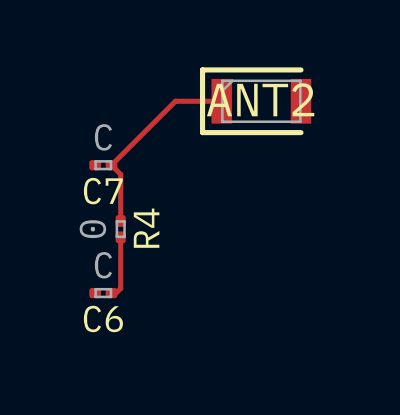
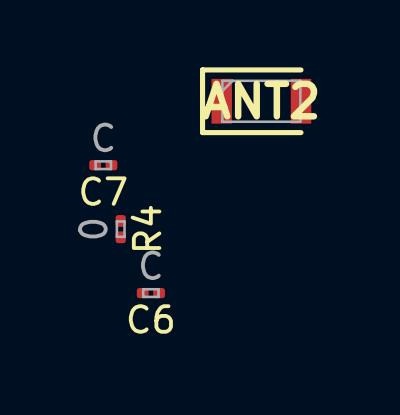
track: (221, 101) (175, 101) (111, 165) (120, 174) (120, 220) -> none
track: (120, 237) (120, 288) (116, 293) -> none
C6 position: (103, 293) -> (150, 293)

